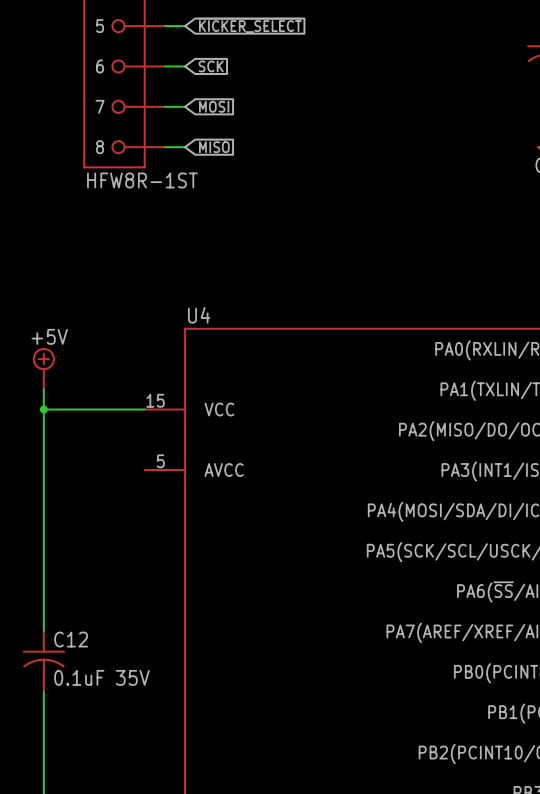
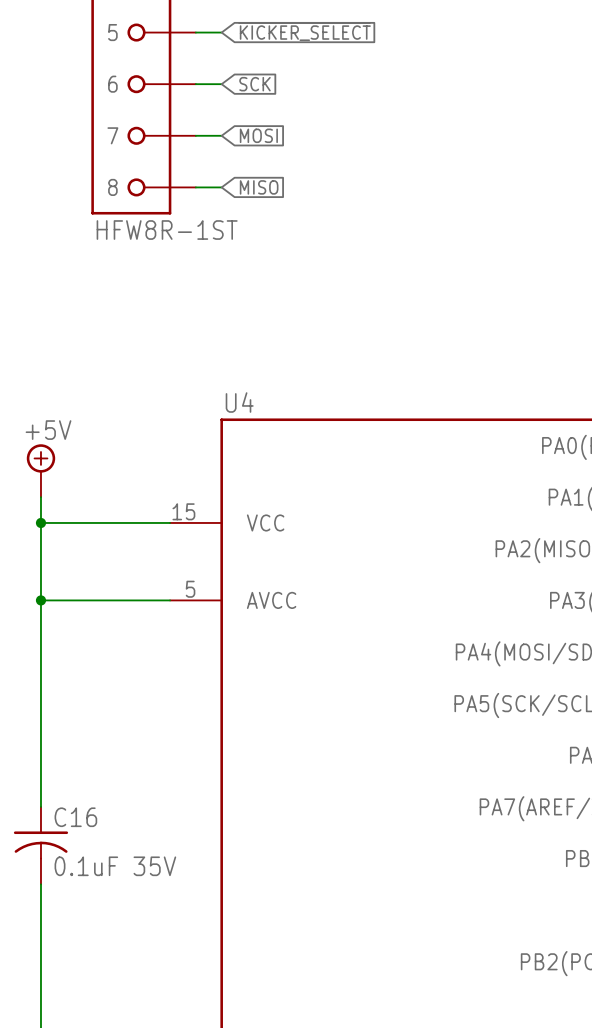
wire: none -> (40, 600) (170, 600)
junction: none -> (40, 600)
C12 name: C12 (71, 639) -> C16 (75, 817)

